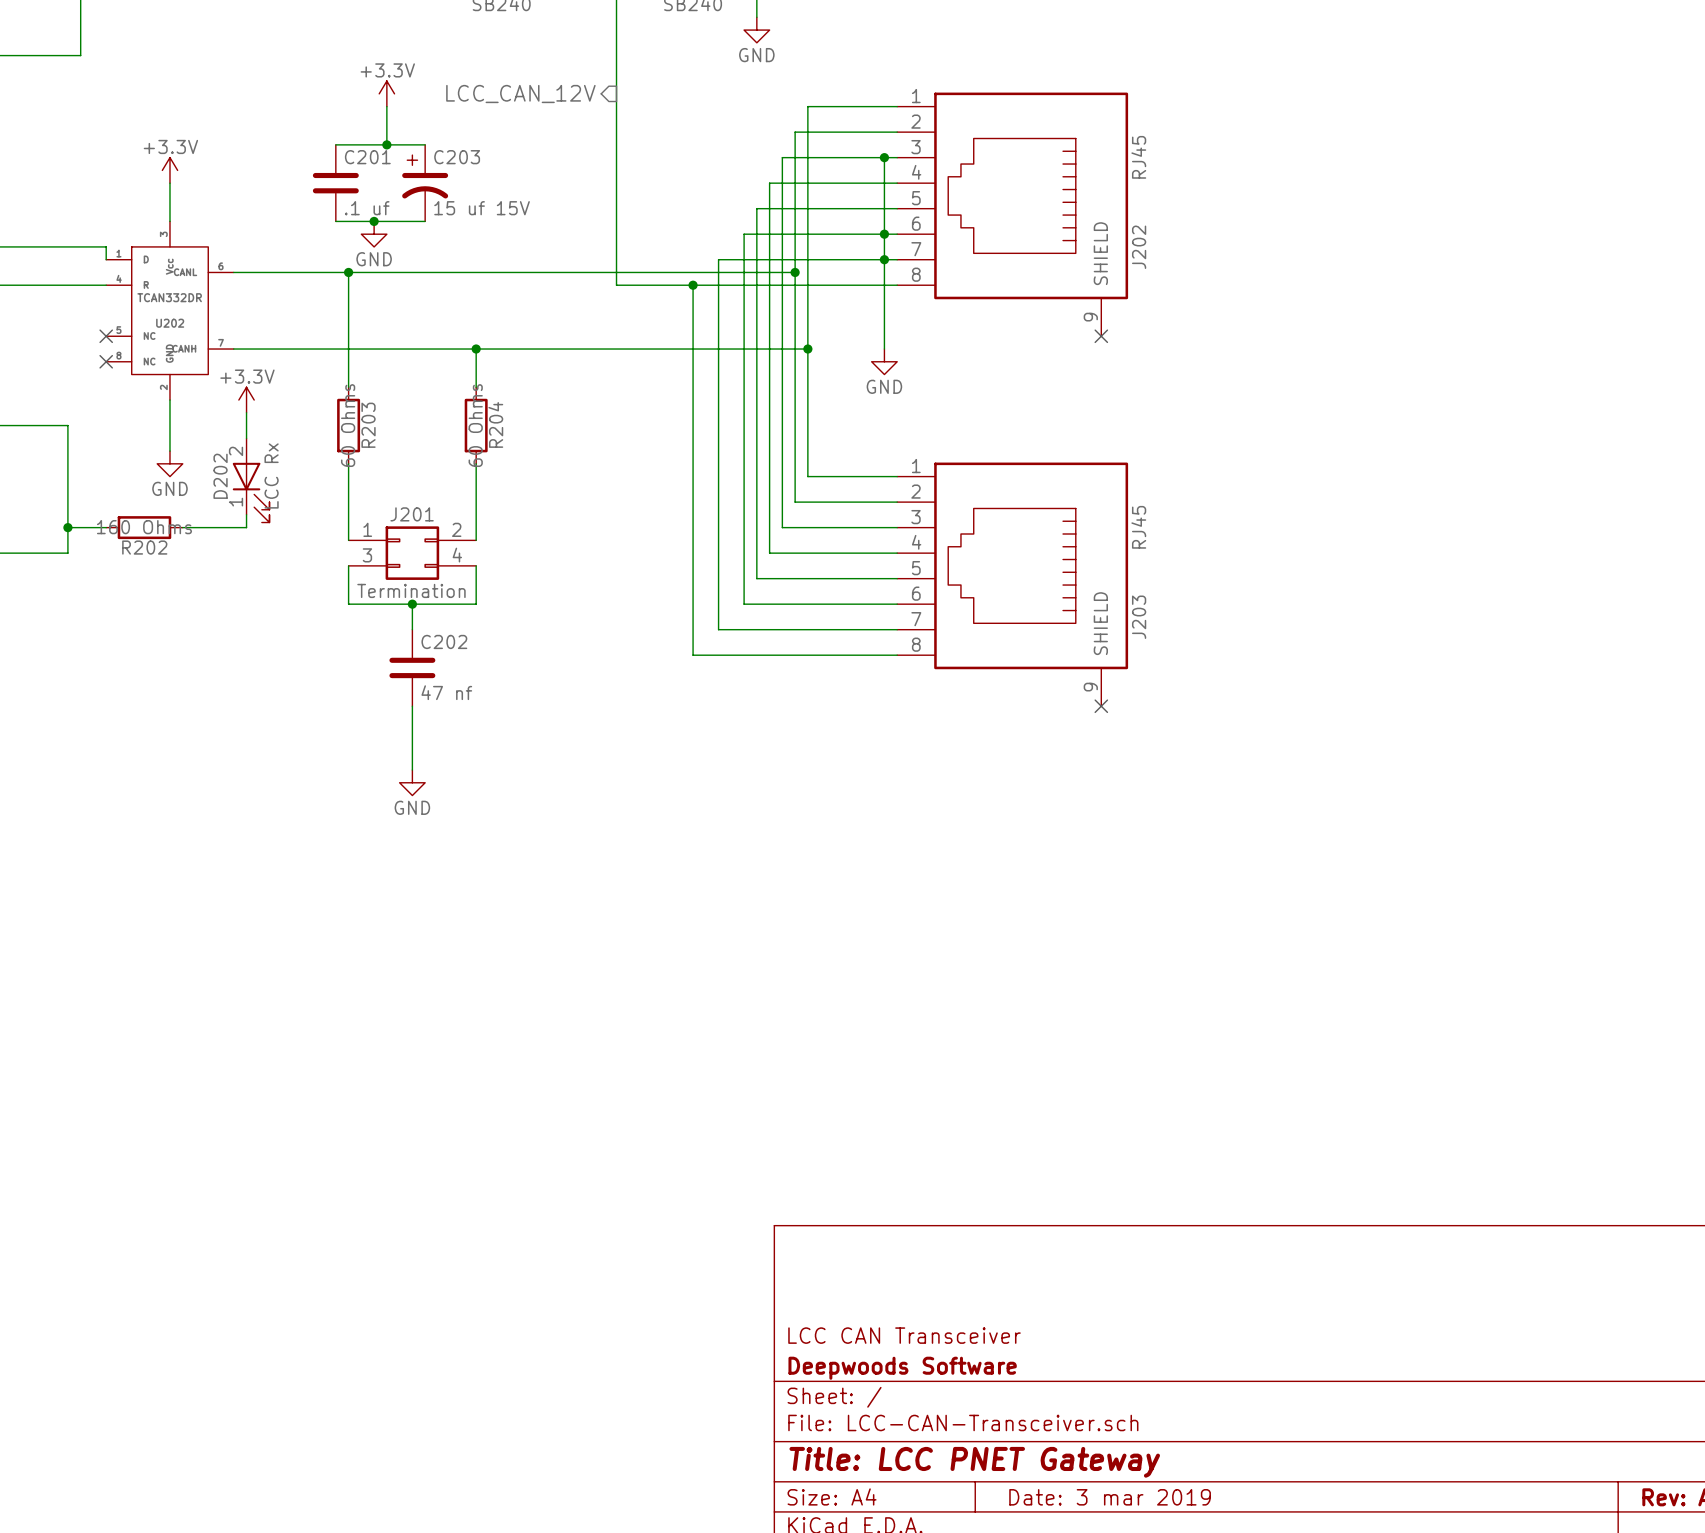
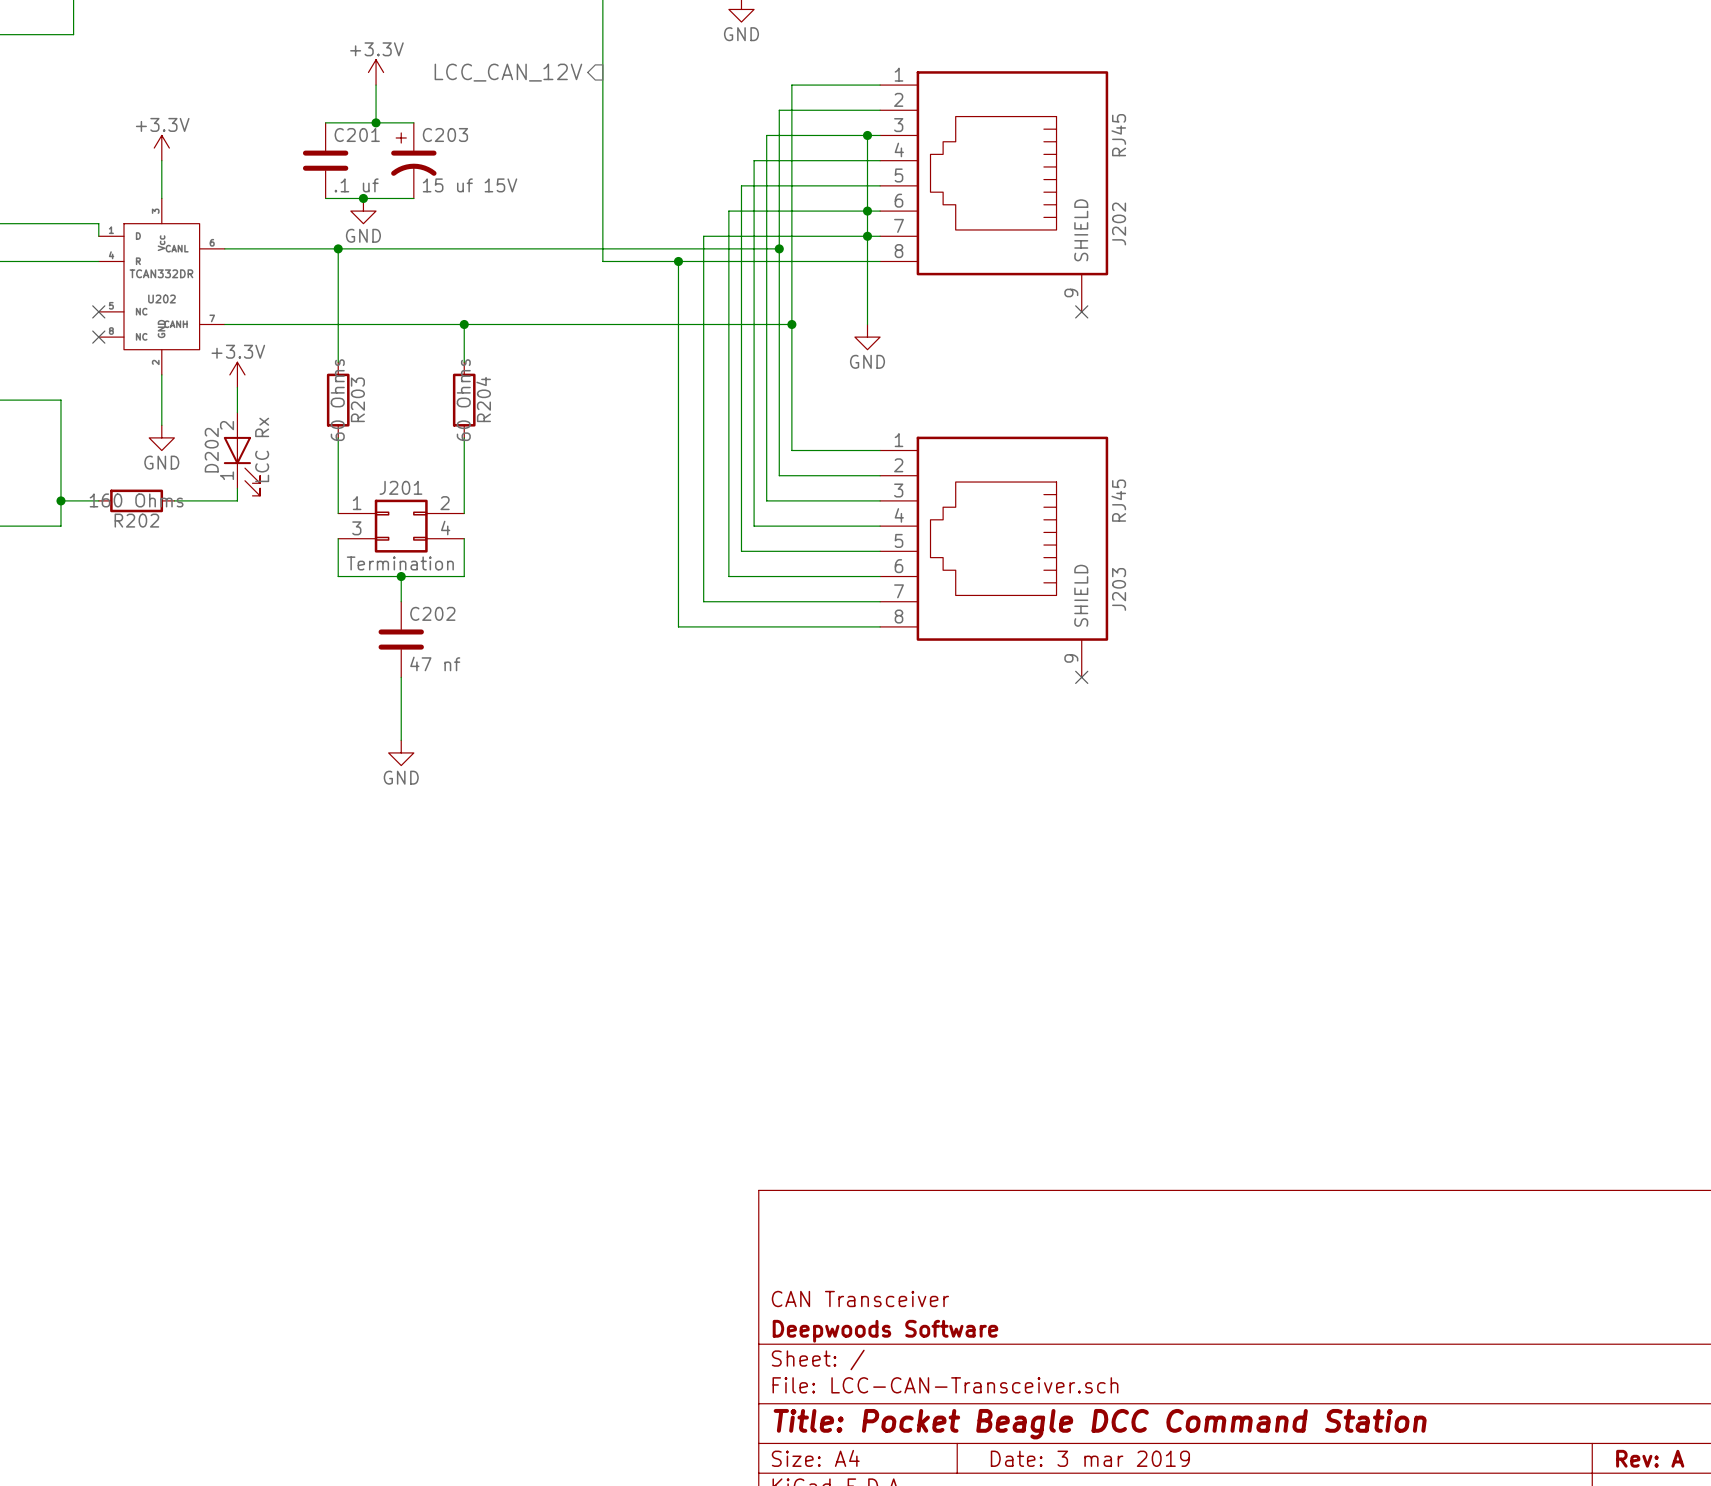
title block: LCC CAN Transceiver (904, 1335) -> CAN Transceiver (860, 1299)
title block: Title: LCC PNET Gateway (974, 1462) -> Title: Pocket Beagle DCC Command Station (1100, 1424)

